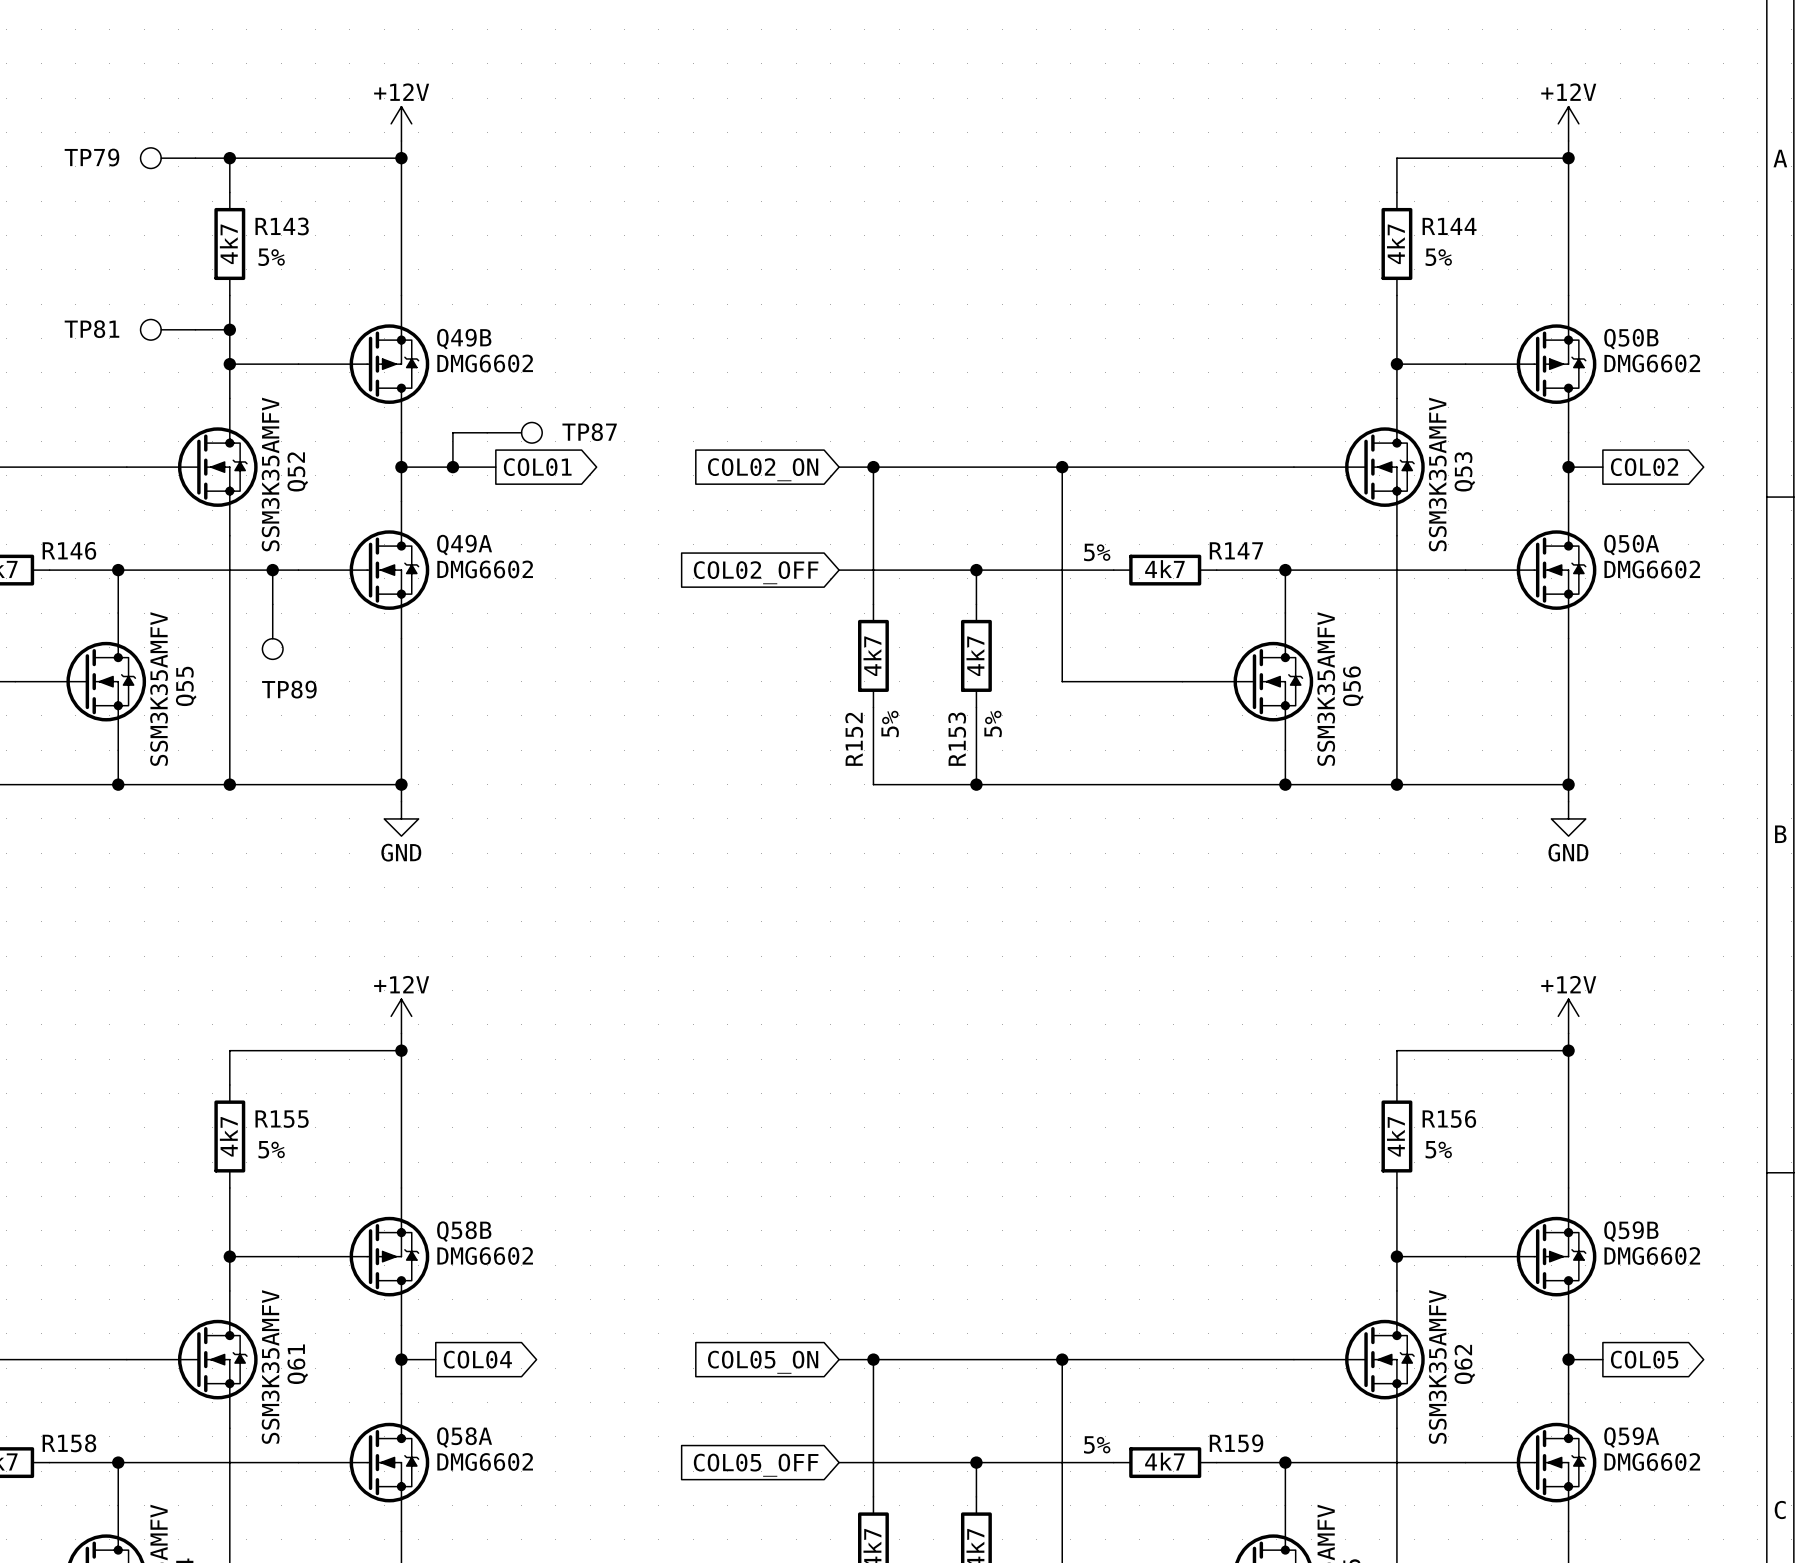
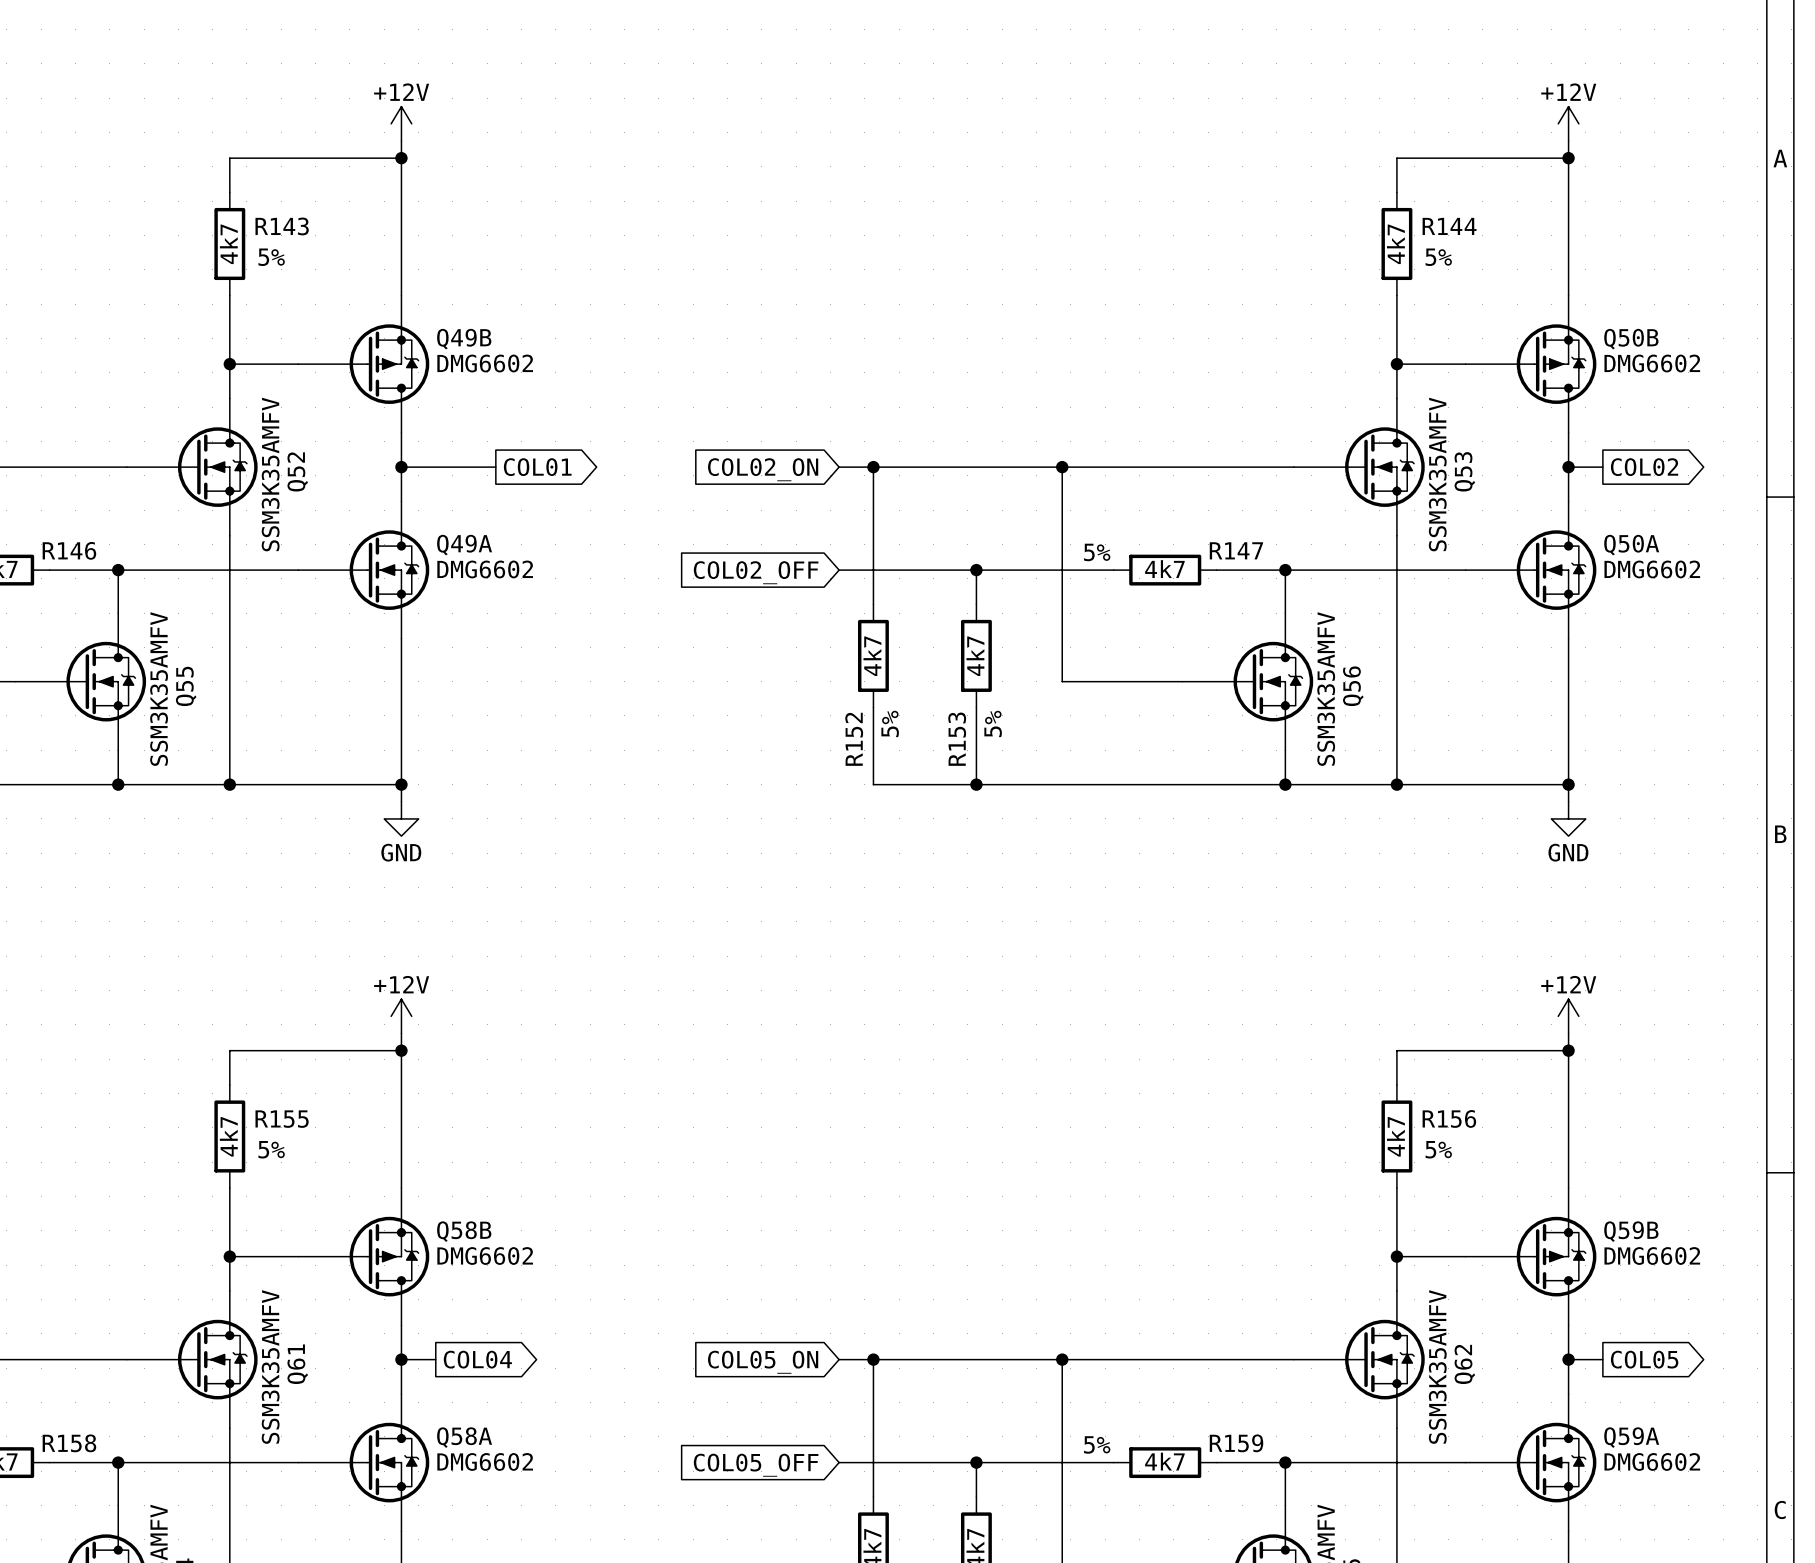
TP79: (168, 158) -> none
wire: (195, 158) (229, 158) -> none
junction: (229, 158) -> none
TP81: (168, 329) -> none
wire: (195, 329) (229, 329) -> none
junction: (229, 329) -> none
wire: (487, 432) (452, 432) (452, 467) -> none
TP87: (514, 432) -> none
junction: (452, 467) -> none
wire: (272, 570) (272, 604) -> none
junction: (272, 570) -> none
TP89: (272, 631) -> none

